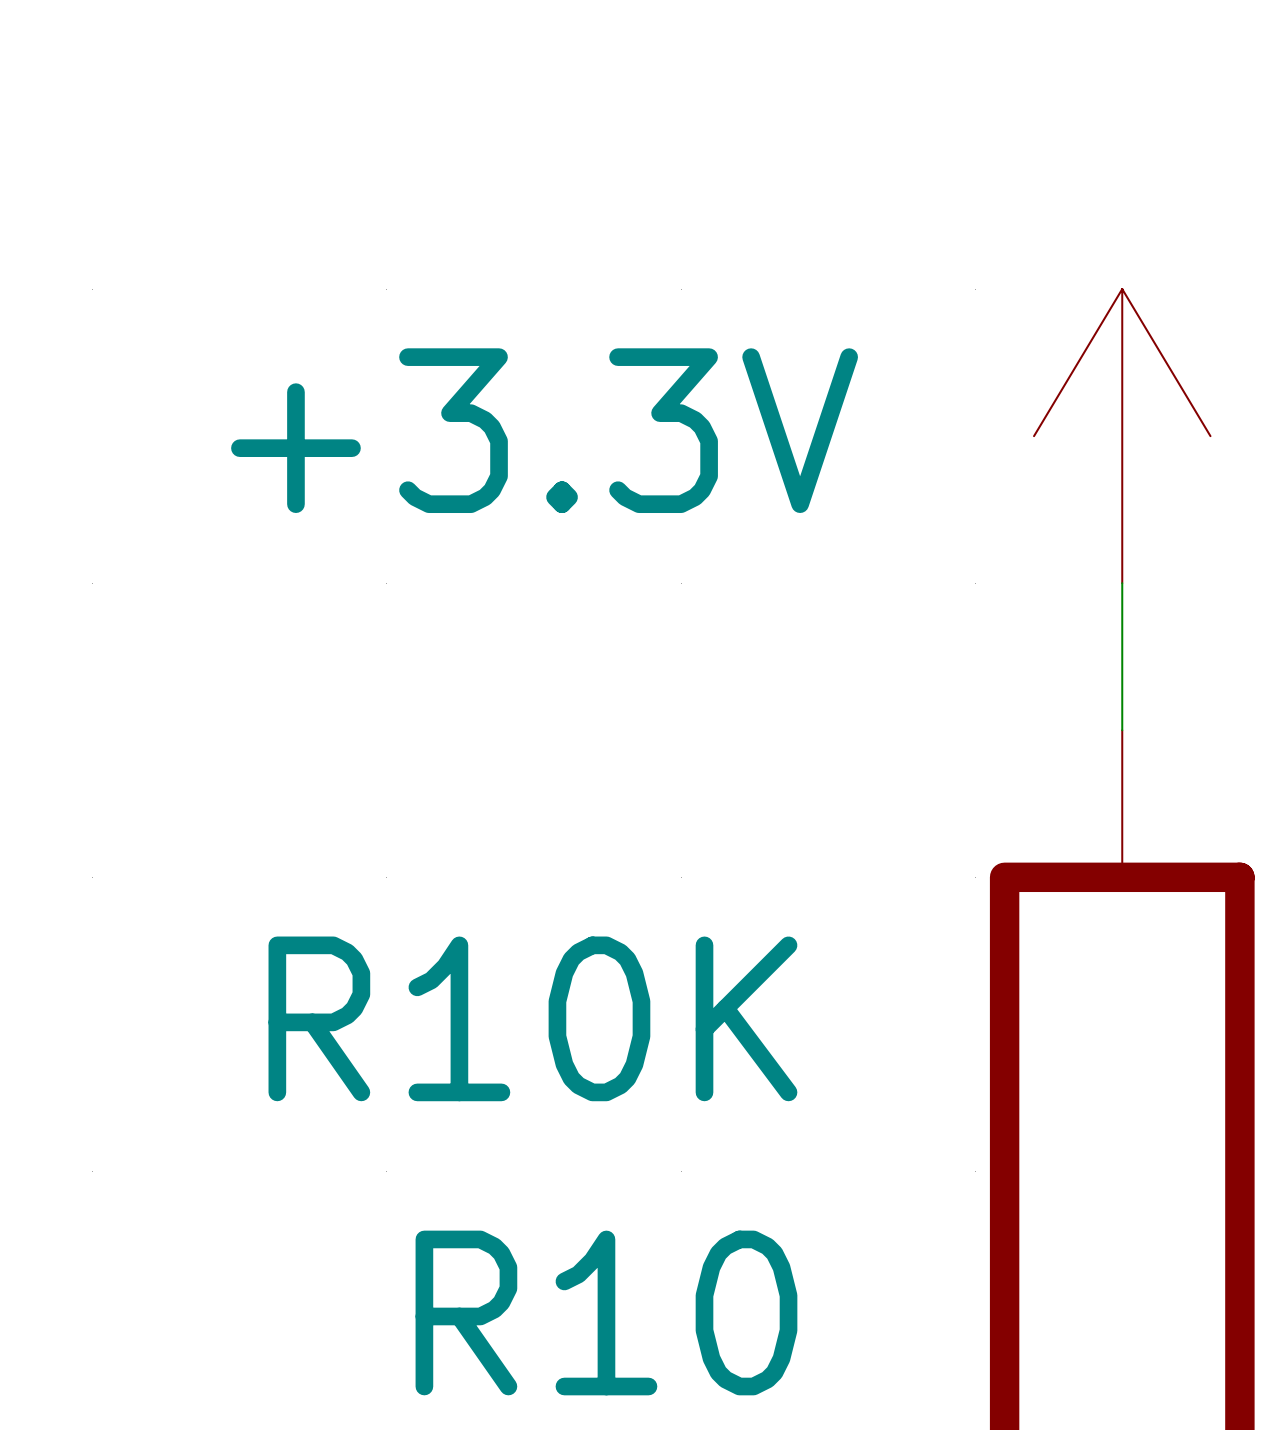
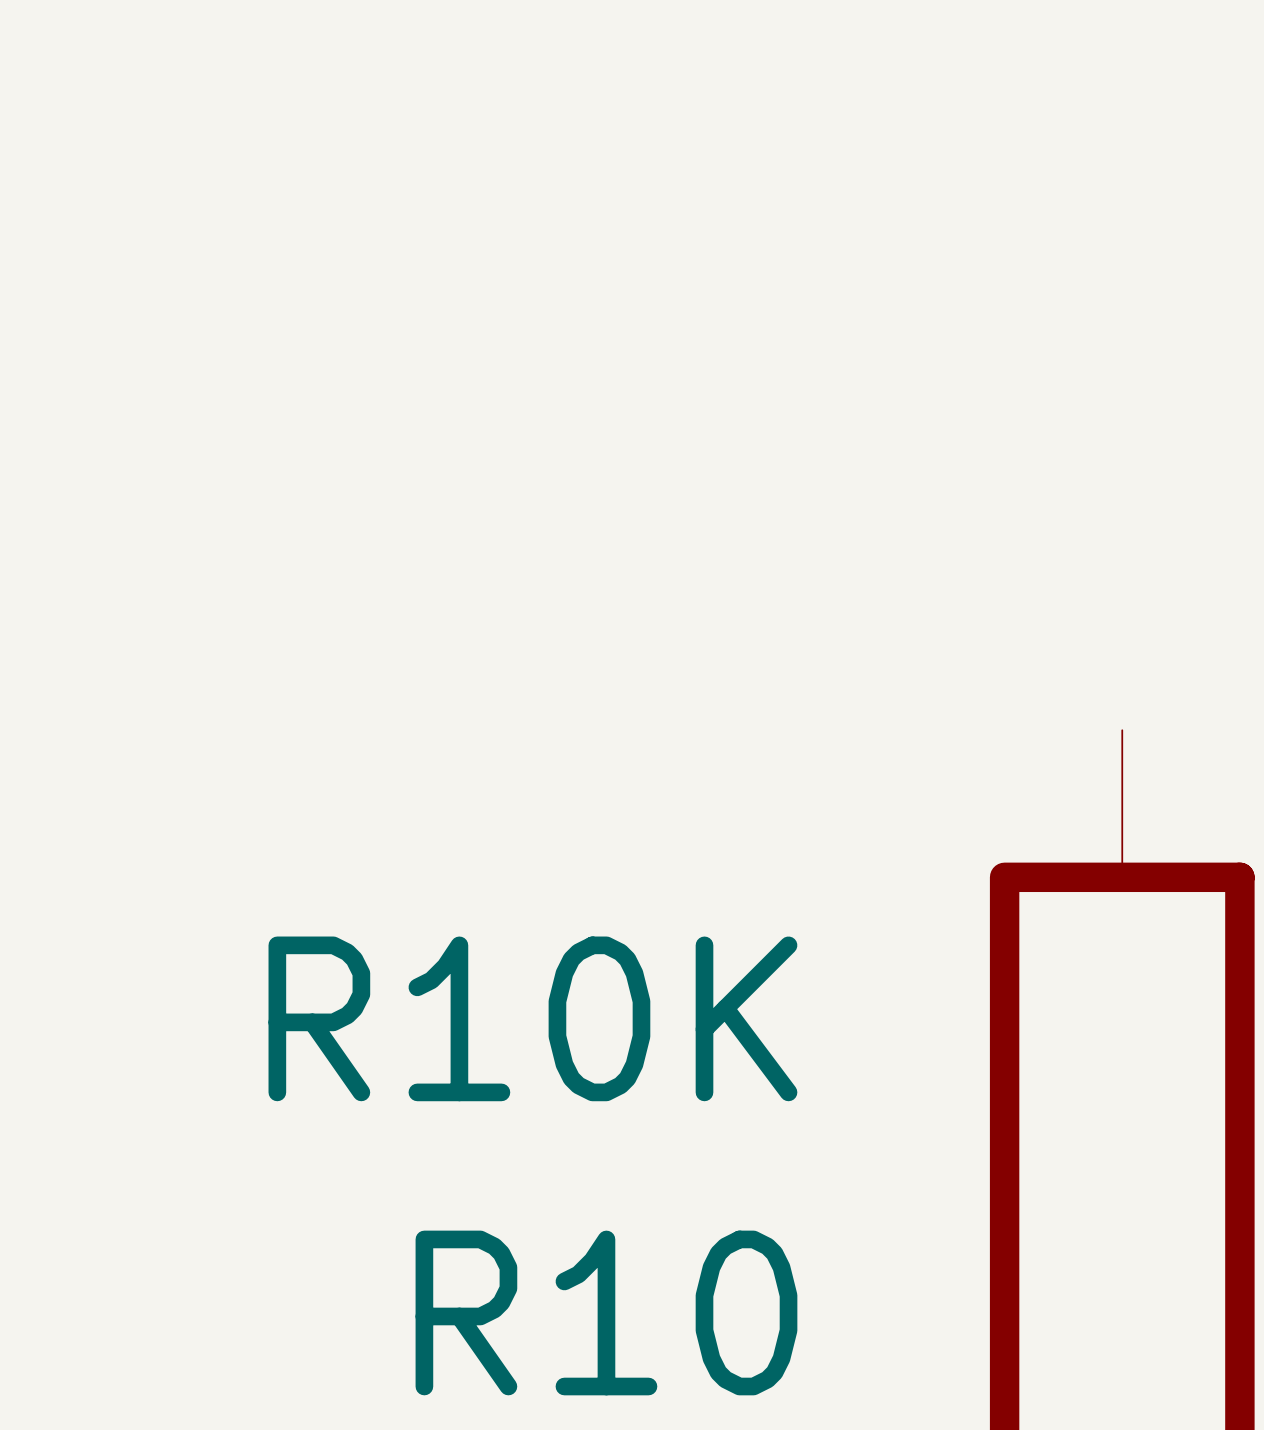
power symbol: +3.3V (1122, 436) -> none
wire: (1122, 583) (1122, 730) -> none

